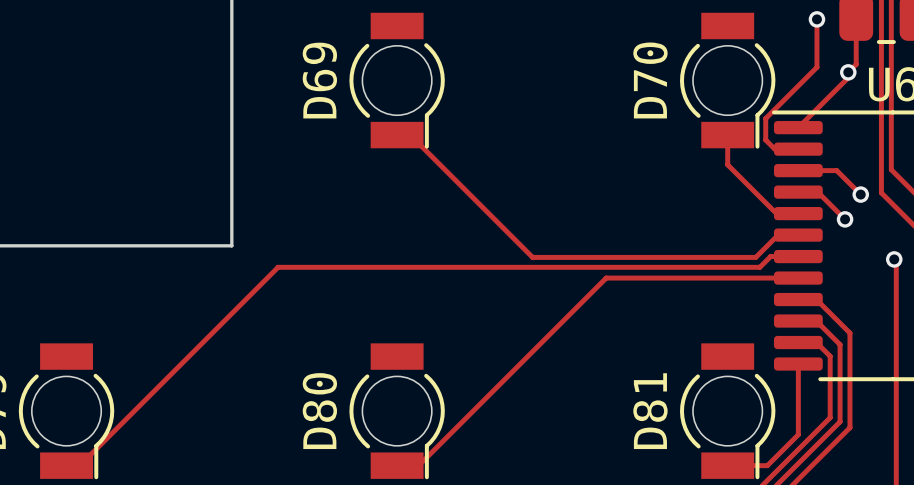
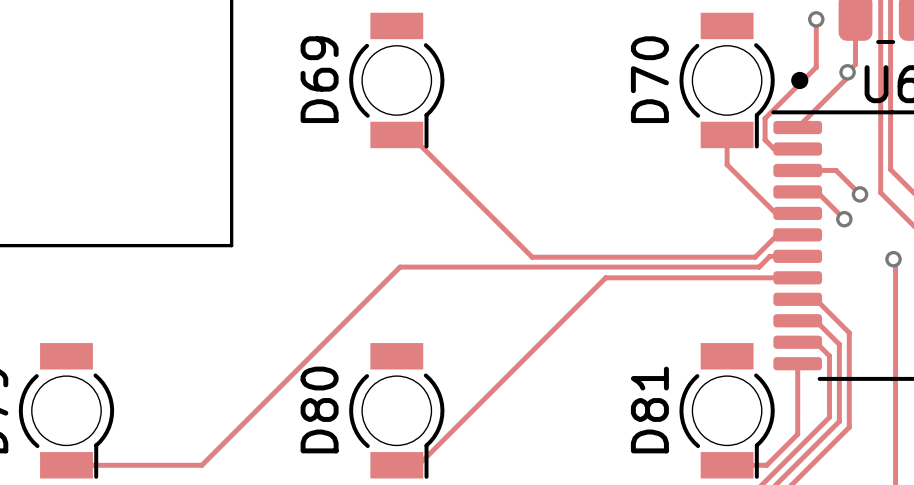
drawing: none -> [791, 71, 809, 90]
track: (400, 267) (278, 267) (79, 465) -> (400, 267) (201, 465) (79, 465)

